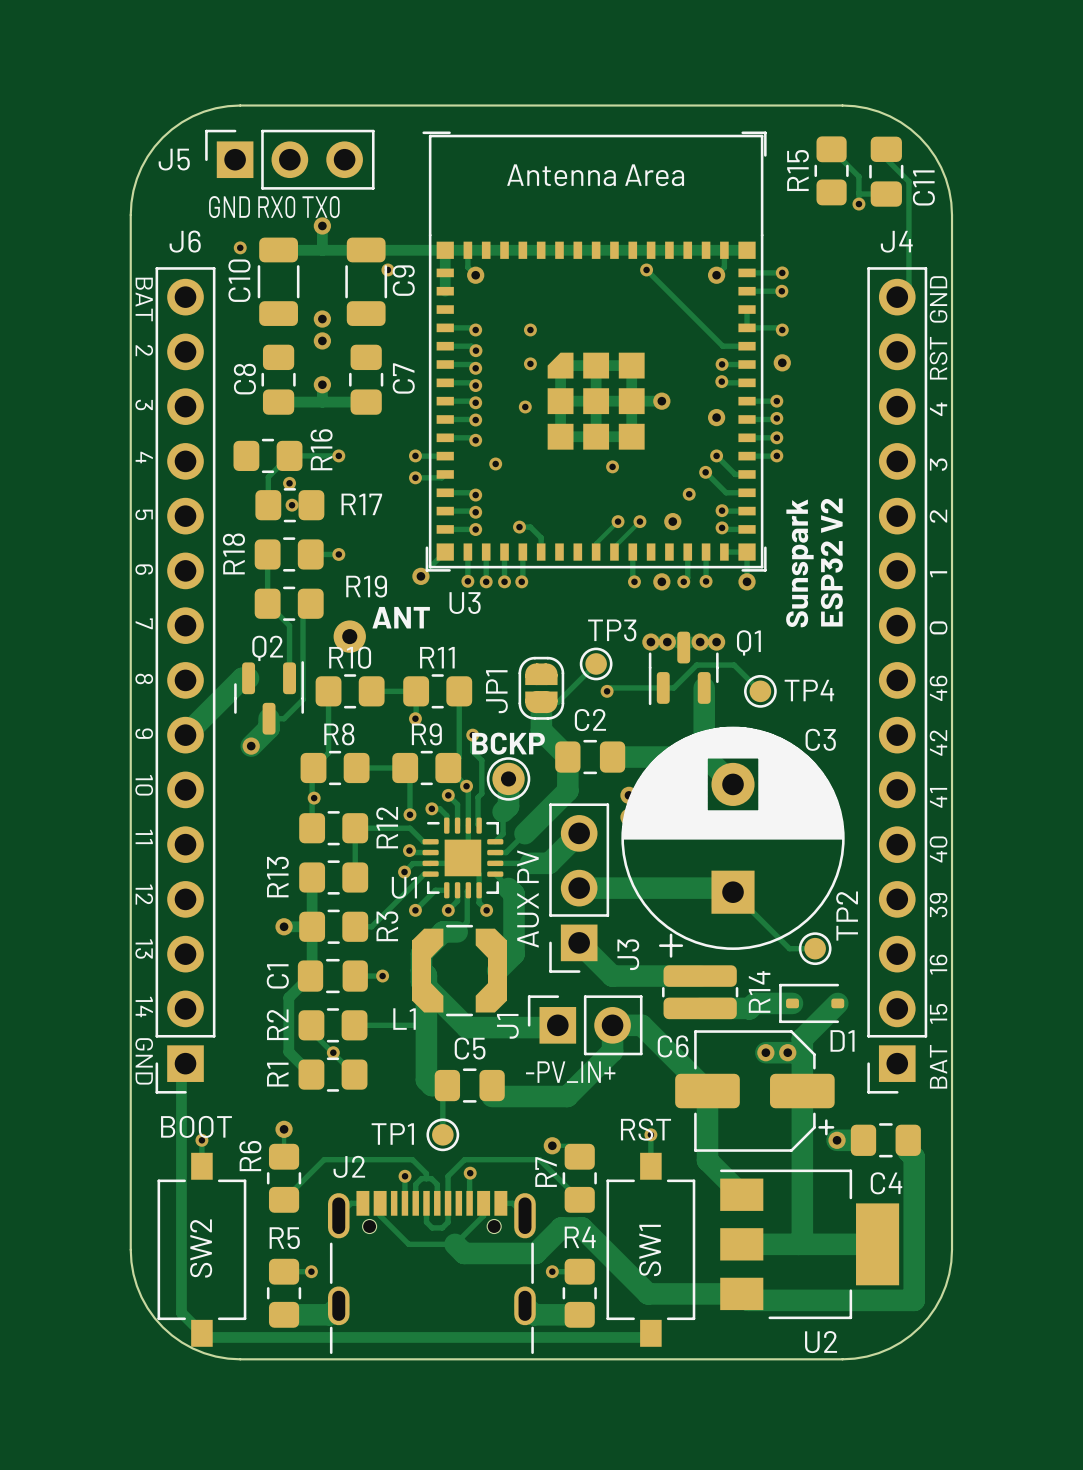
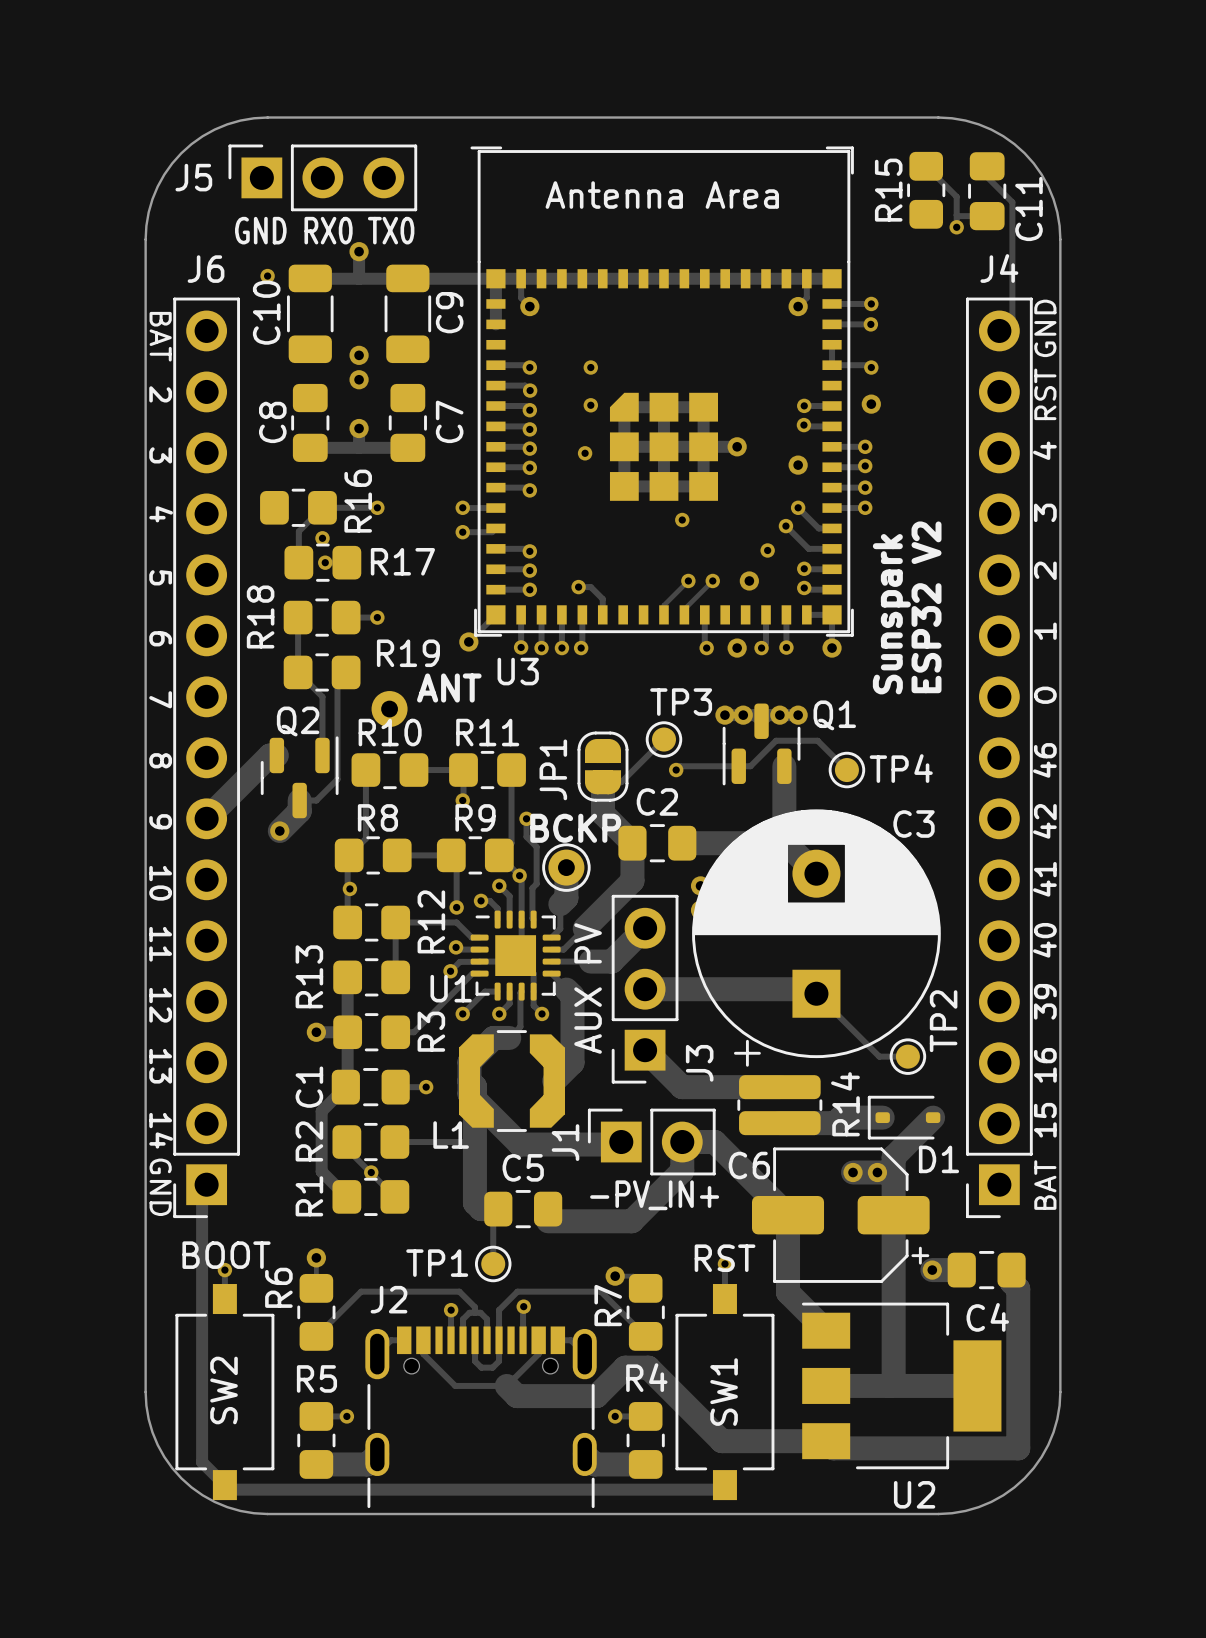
via: (387, 269) -> none
track: (646, 269) (722, 346) (747, 346) -> none
via: (646, 269) -> none
via: (495, 463) -> none

